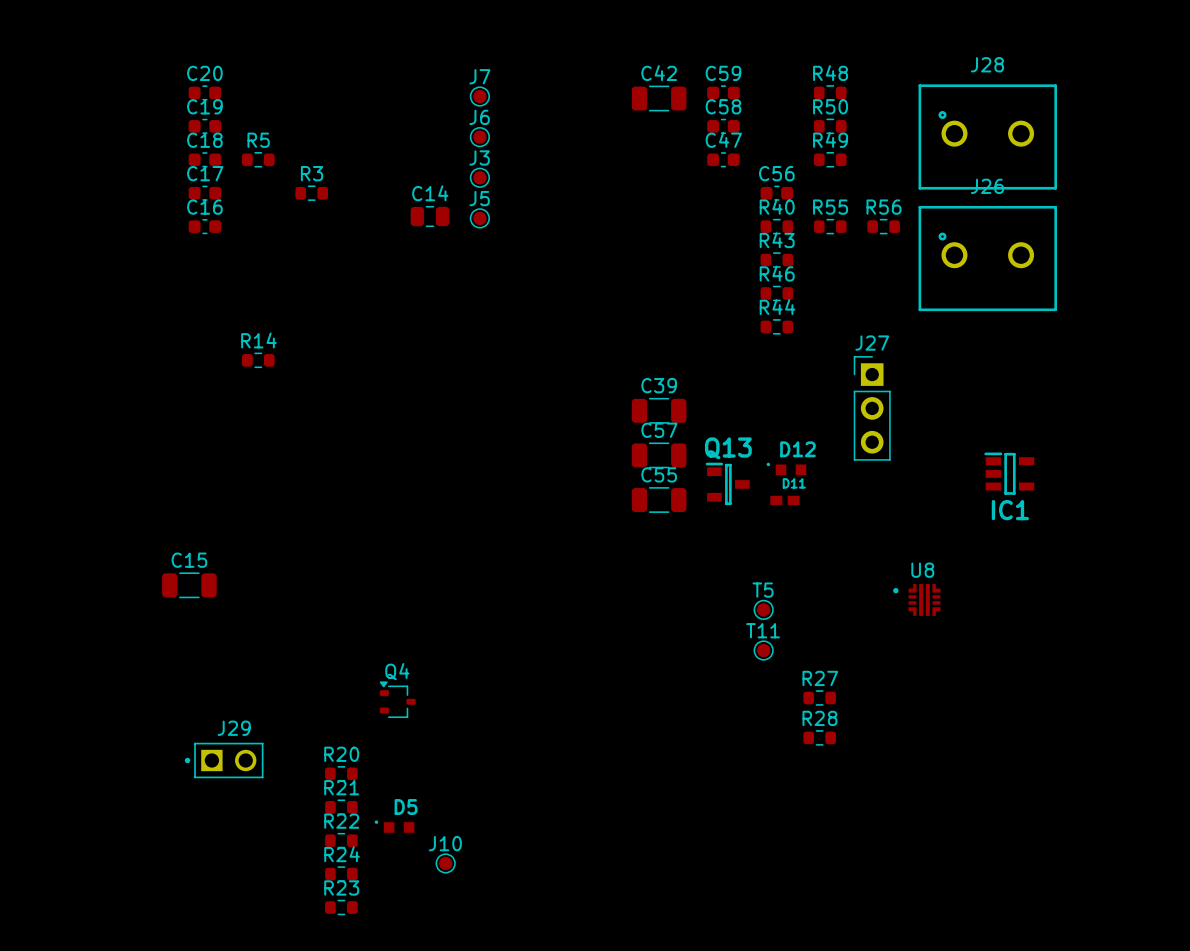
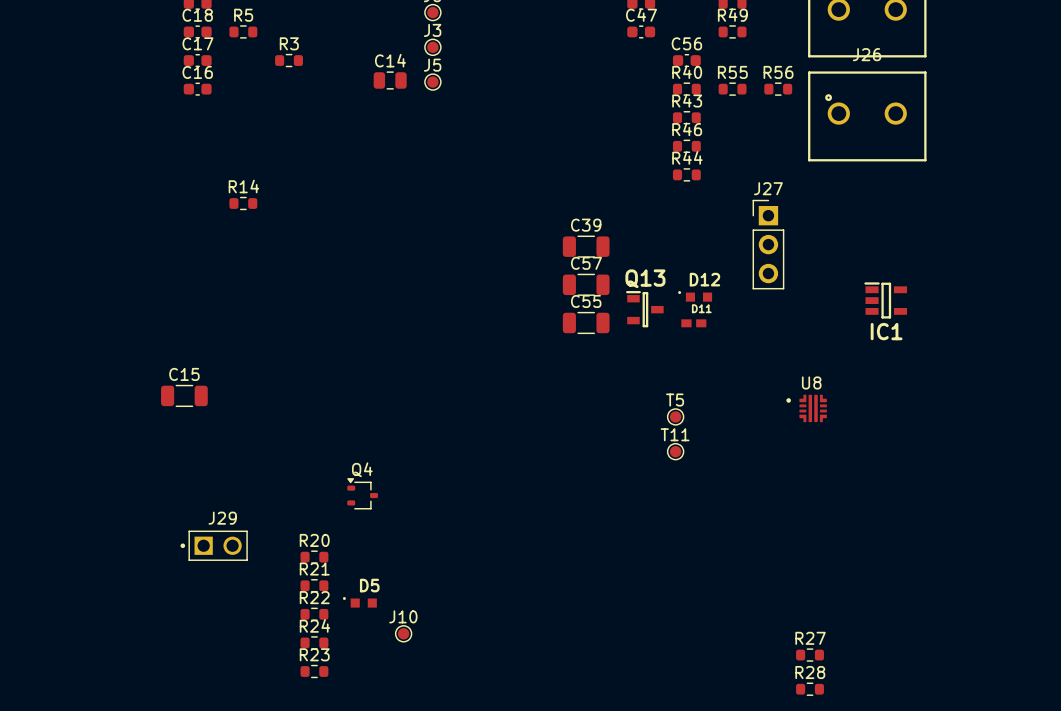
R27 position: (819, 697) -> (810, 655)
R28 position: (819, 737) -> (810, 689)

